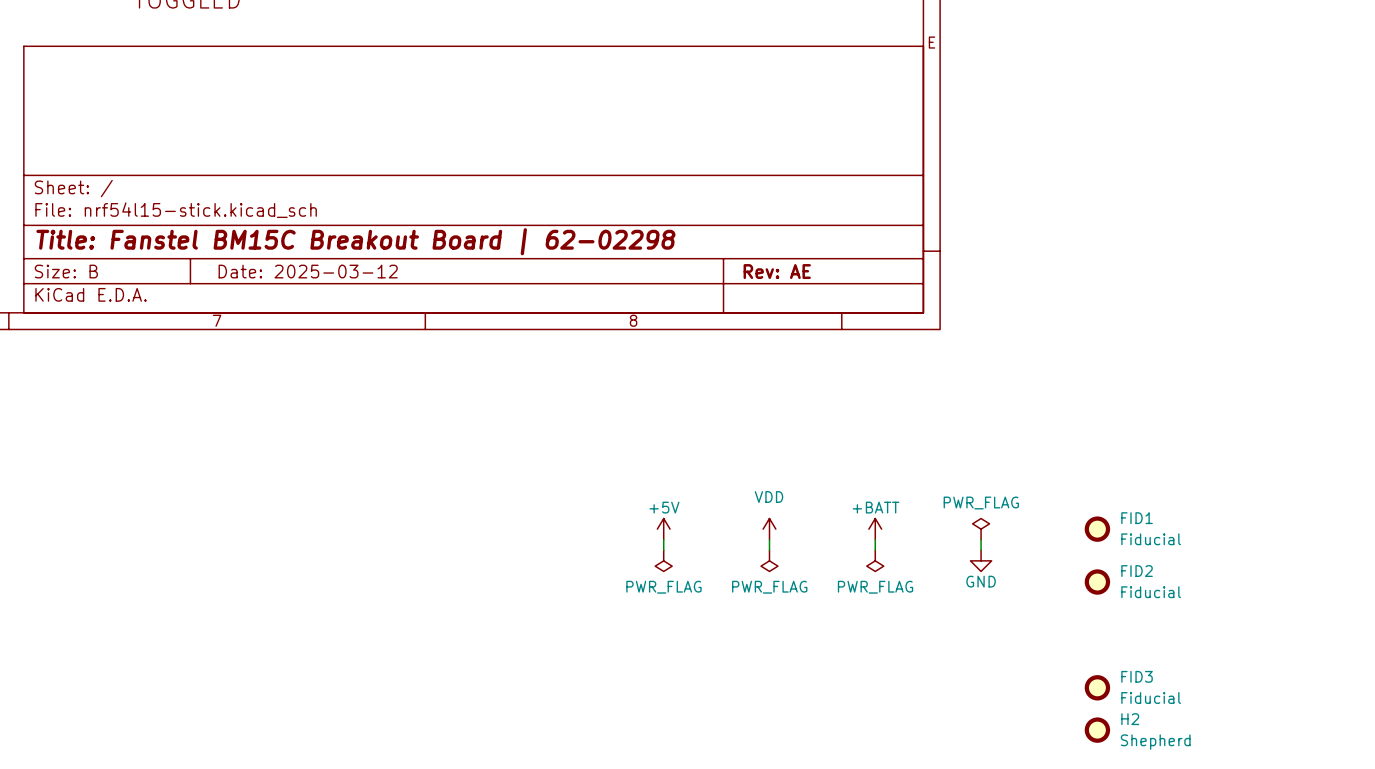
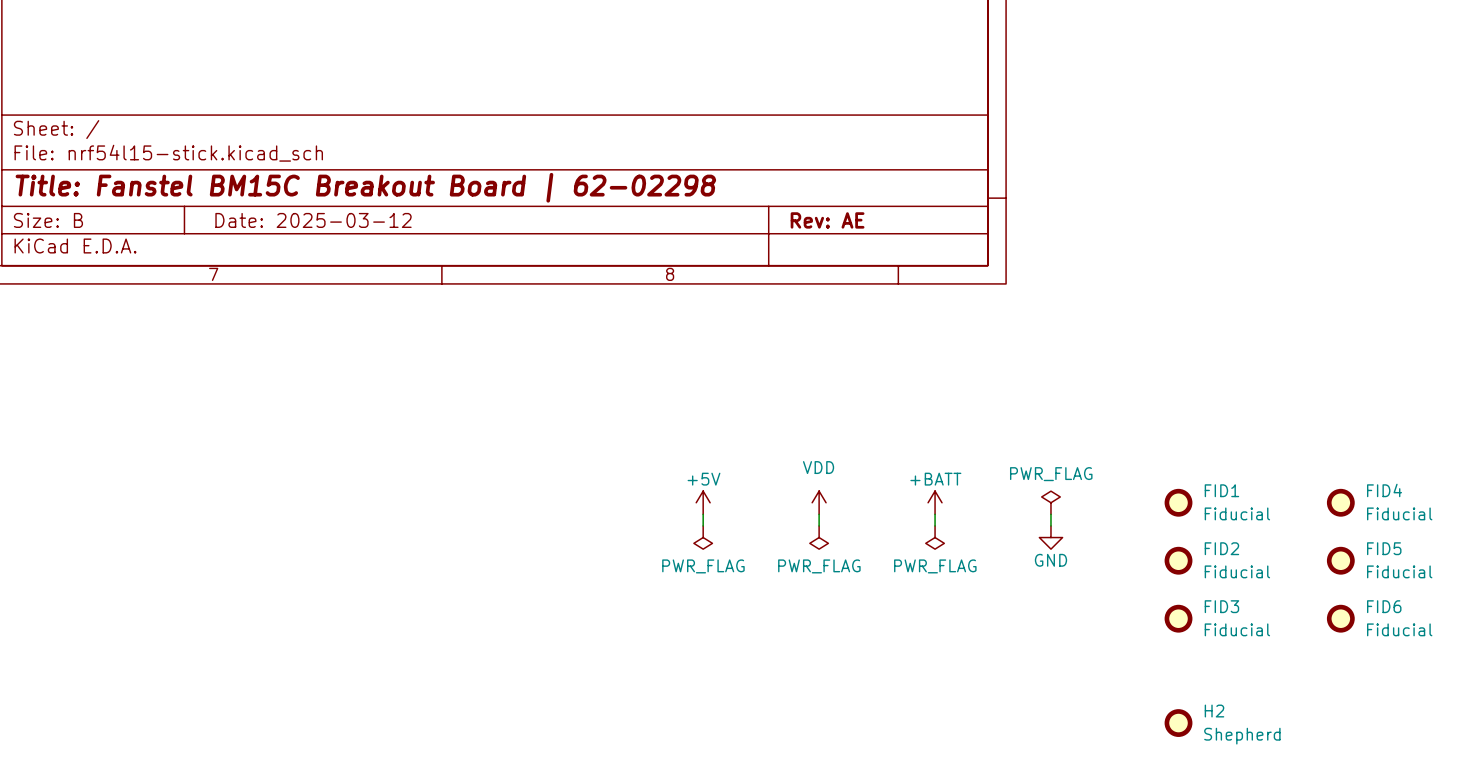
FID4: none -> Fiducial (1340, 502)
FID5: none -> Fiducial (1340, 560)
FID6: none -> Fiducial (1340, 618)
FID3 position: (1097, 687) -> (1178, 618)

